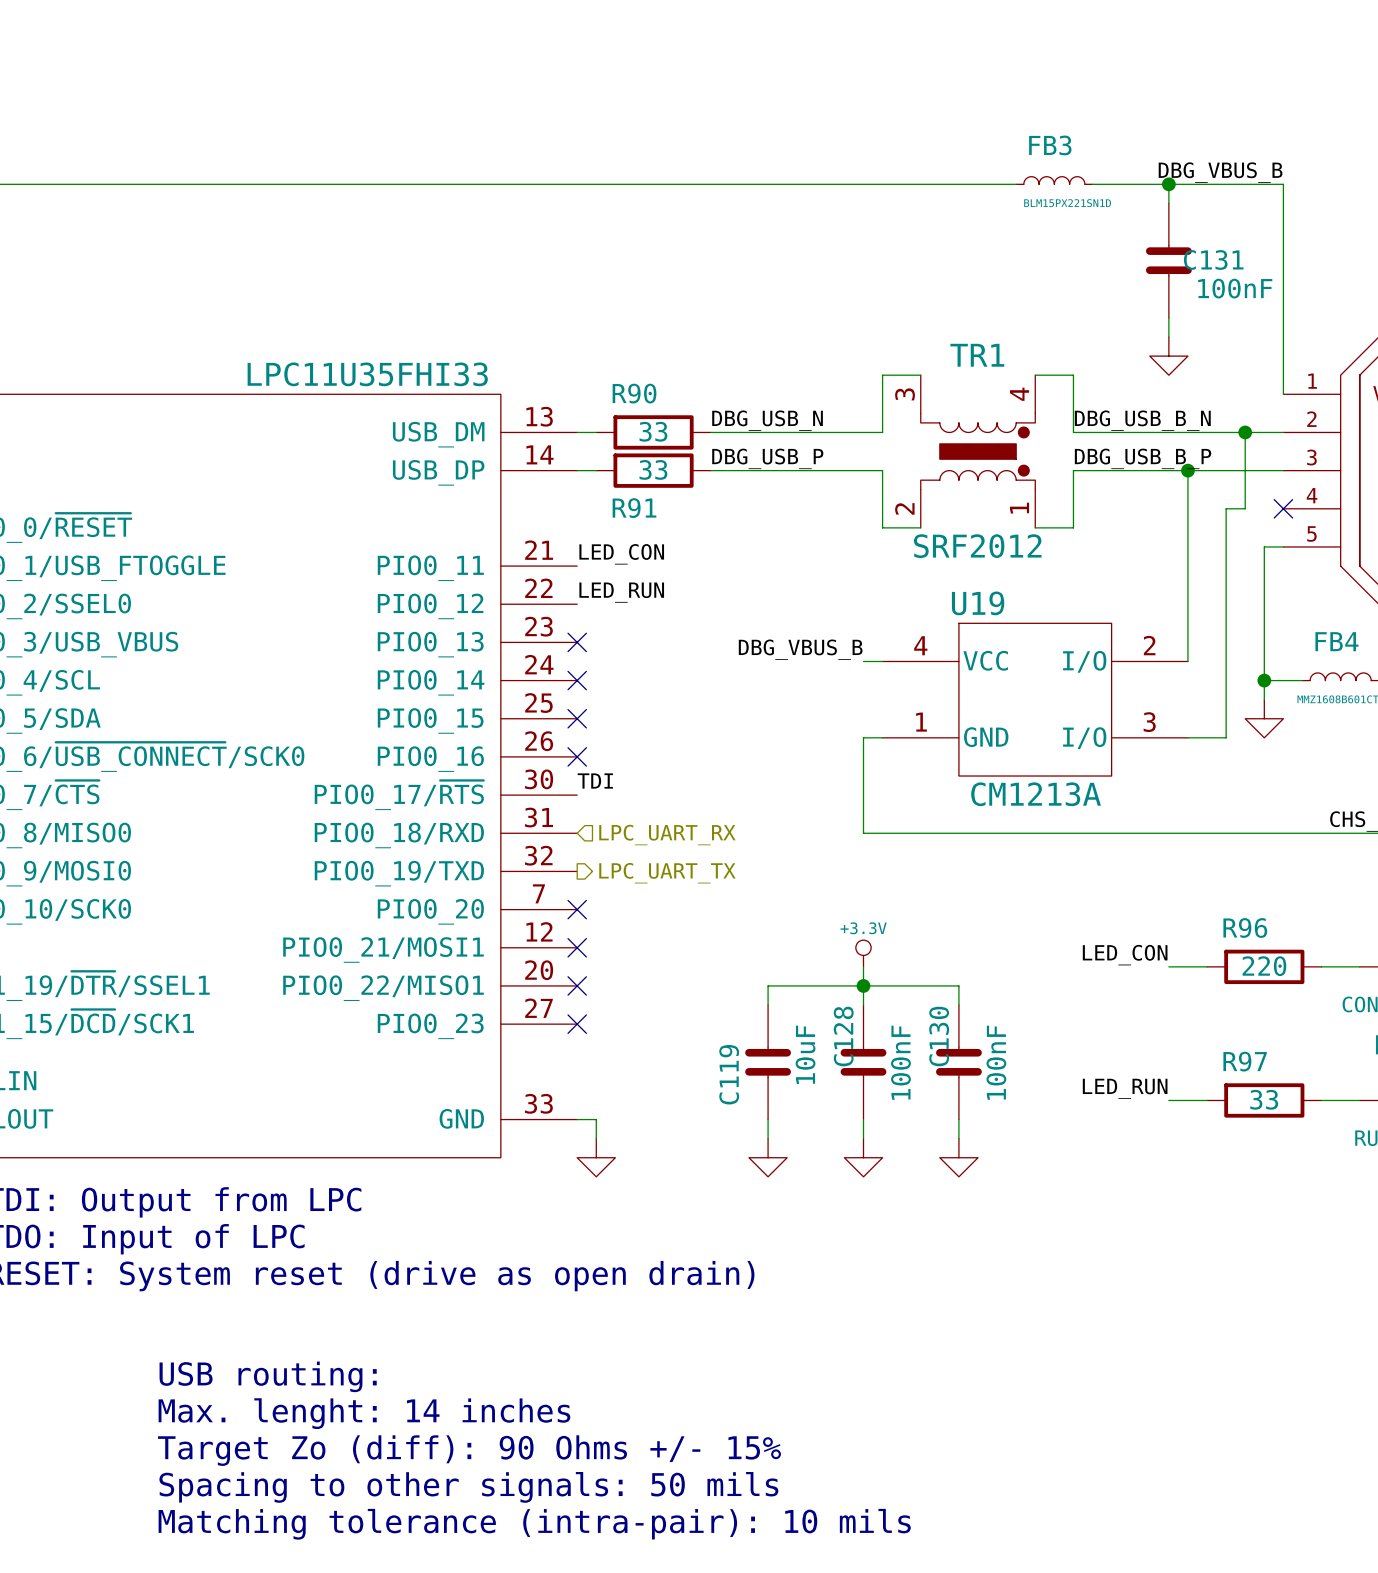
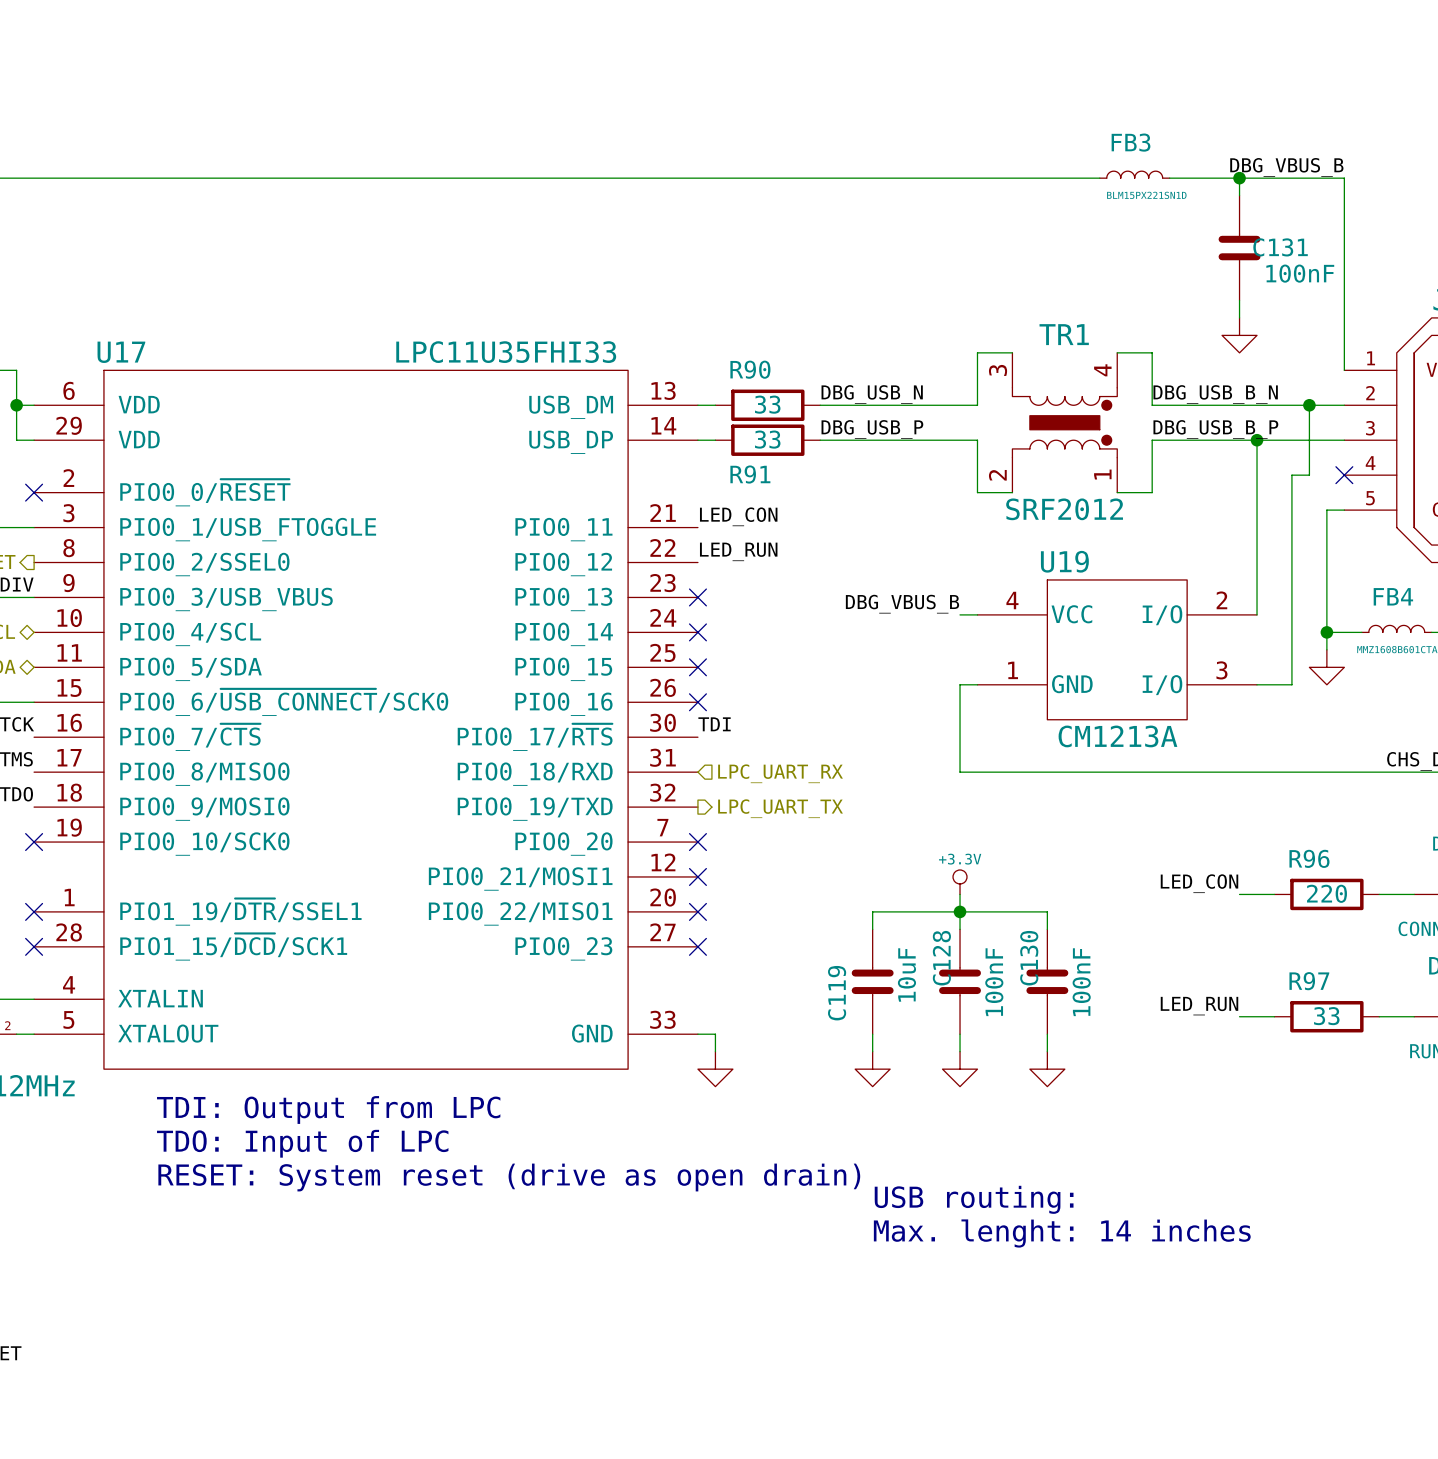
text: none -> USB routing: (974, 1199)
text: none -> Max. lenght: 14 inches (1062, 1233)
text: USB routing: (268, 1376) -> none
text: Max. lenght: 14 inches (364, 1413) -> none
text: Target Zo (diff): 90 Ohms +/- 15% (469, 1450) -> none
text: Spacing to other signals: 50 mils (468, 1487) -> none
text: Matching tolerance (intra-pair): 10 mils (534, 1524) -> none

